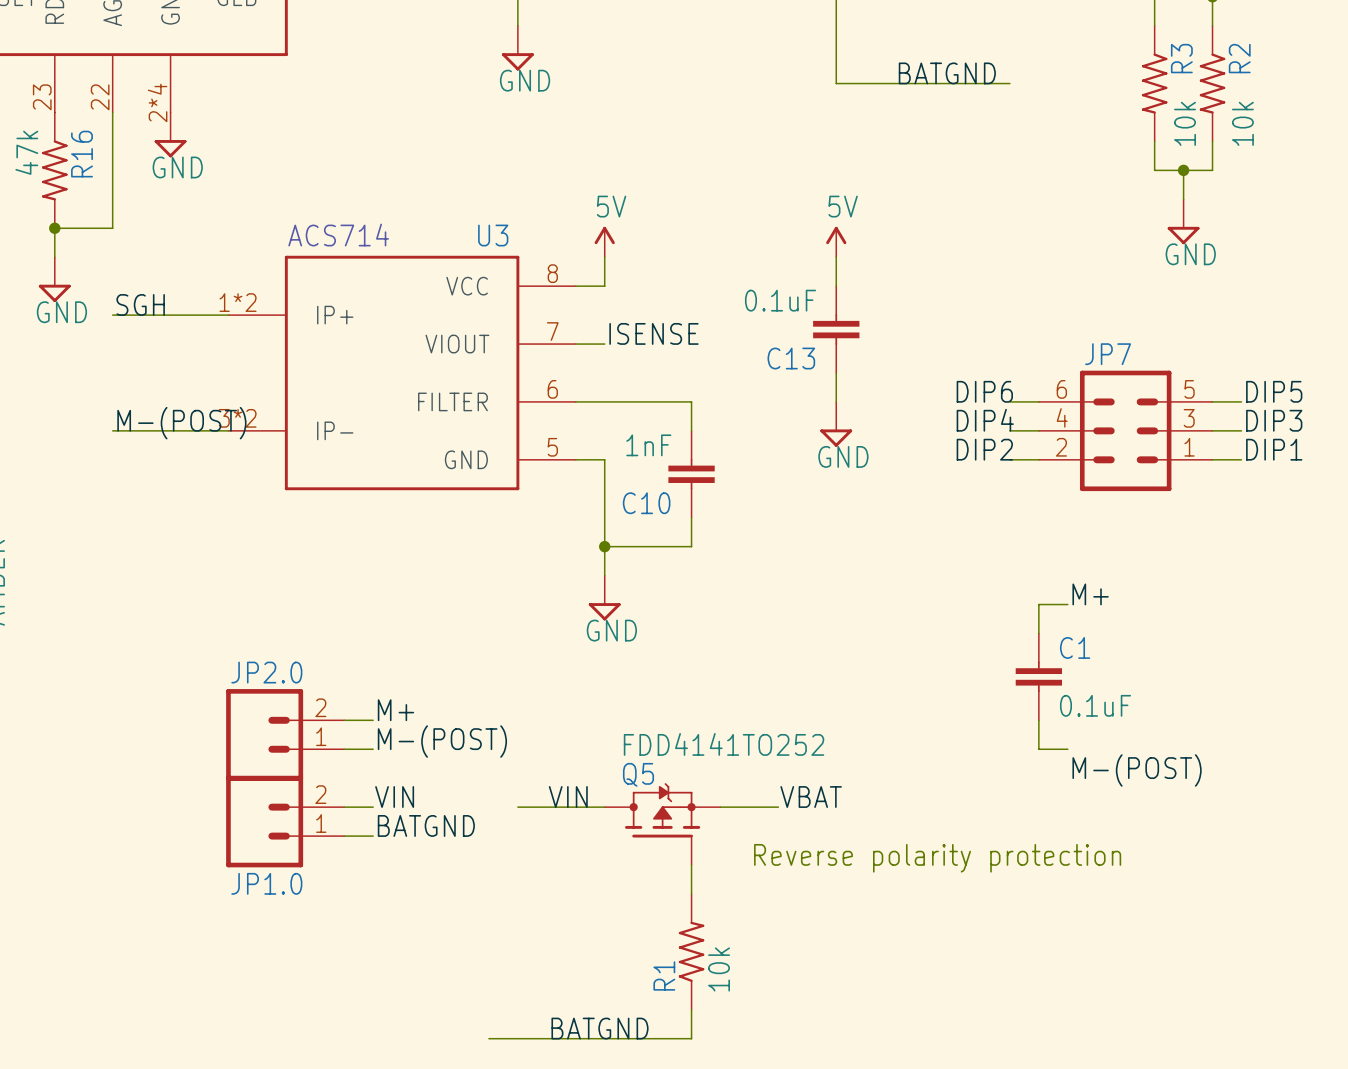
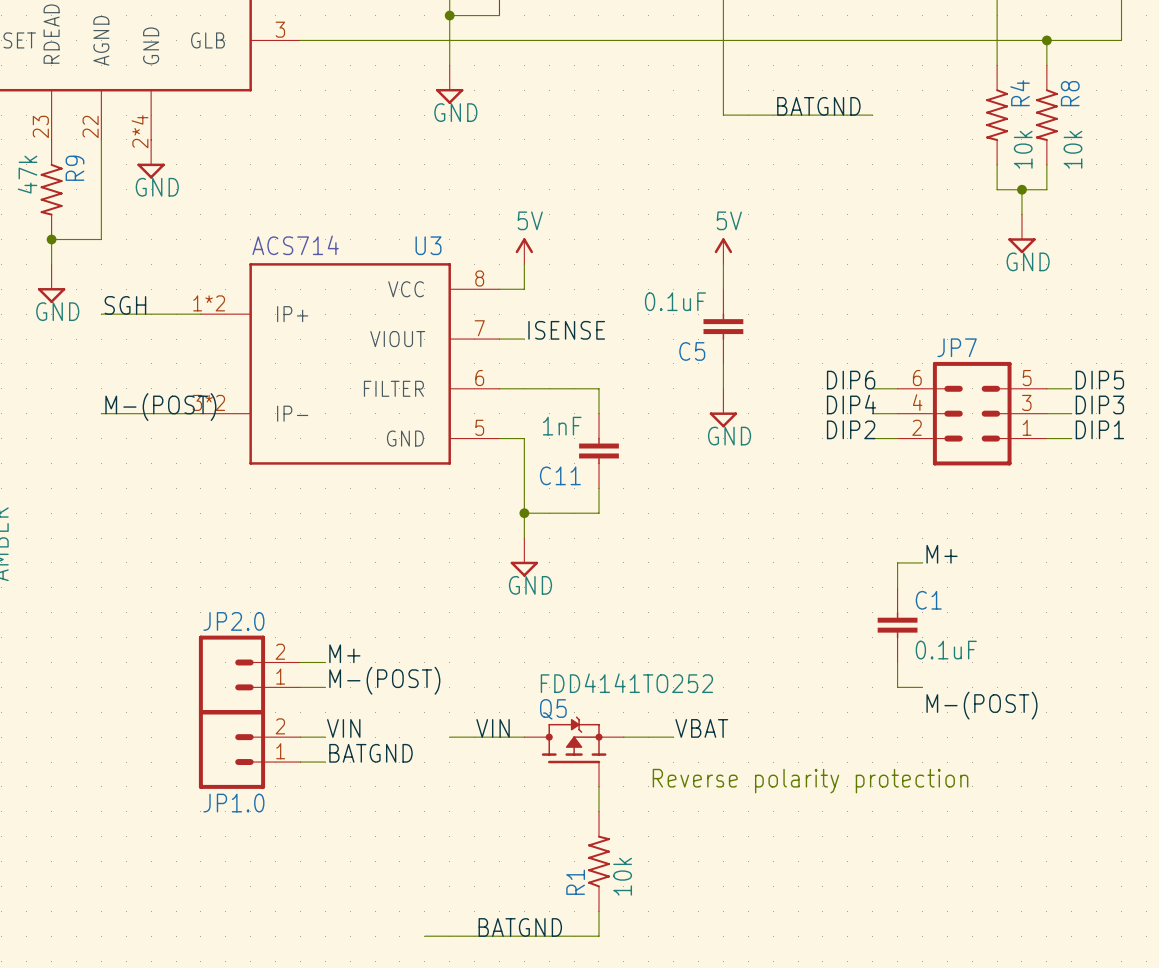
R3 name: R3 (1181, 58) -> R4 (1020, 93)
R2 name: R2 (1239, 58) -> R8 (1070, 93)
R16 name: R16 (81, 154) -> R9 (74, 168)
C13 name: C13 (791, 358) -> C5 (692, 351)
C10 name: C10 (646, 503) -> C11 (560, 475)

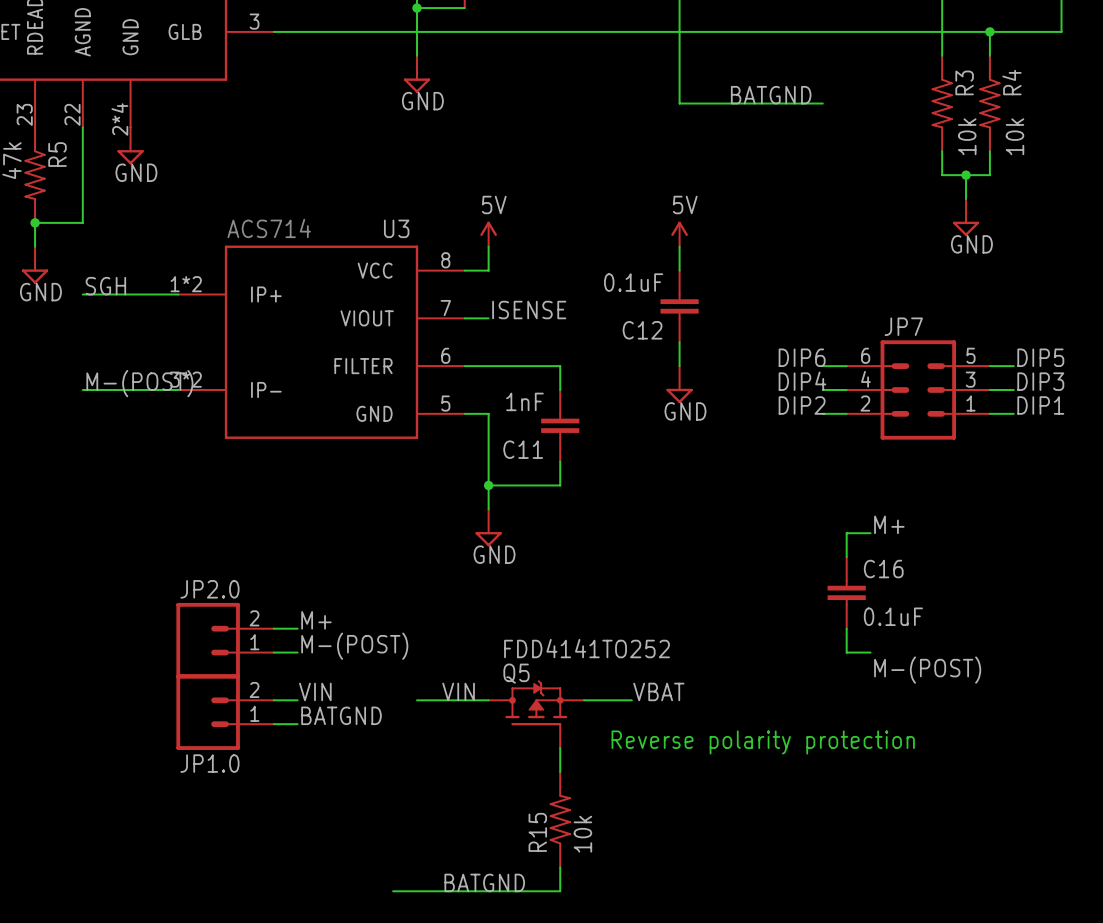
R4 name: R4 (1020, 93) -> R3 (964, 82)
R8 name: R8 (1070, 93) -> R4 (1011, 82)
R9 name: R9 (74, 168) -> R5 (57, 154)
C5 name: C5 (692, 351) -> C12 (642, 330)
C1 name: C1 (928, 600) -> C16 (883, 569)
R1 name: R1 (575, 882) -> R15 (537, 832)

